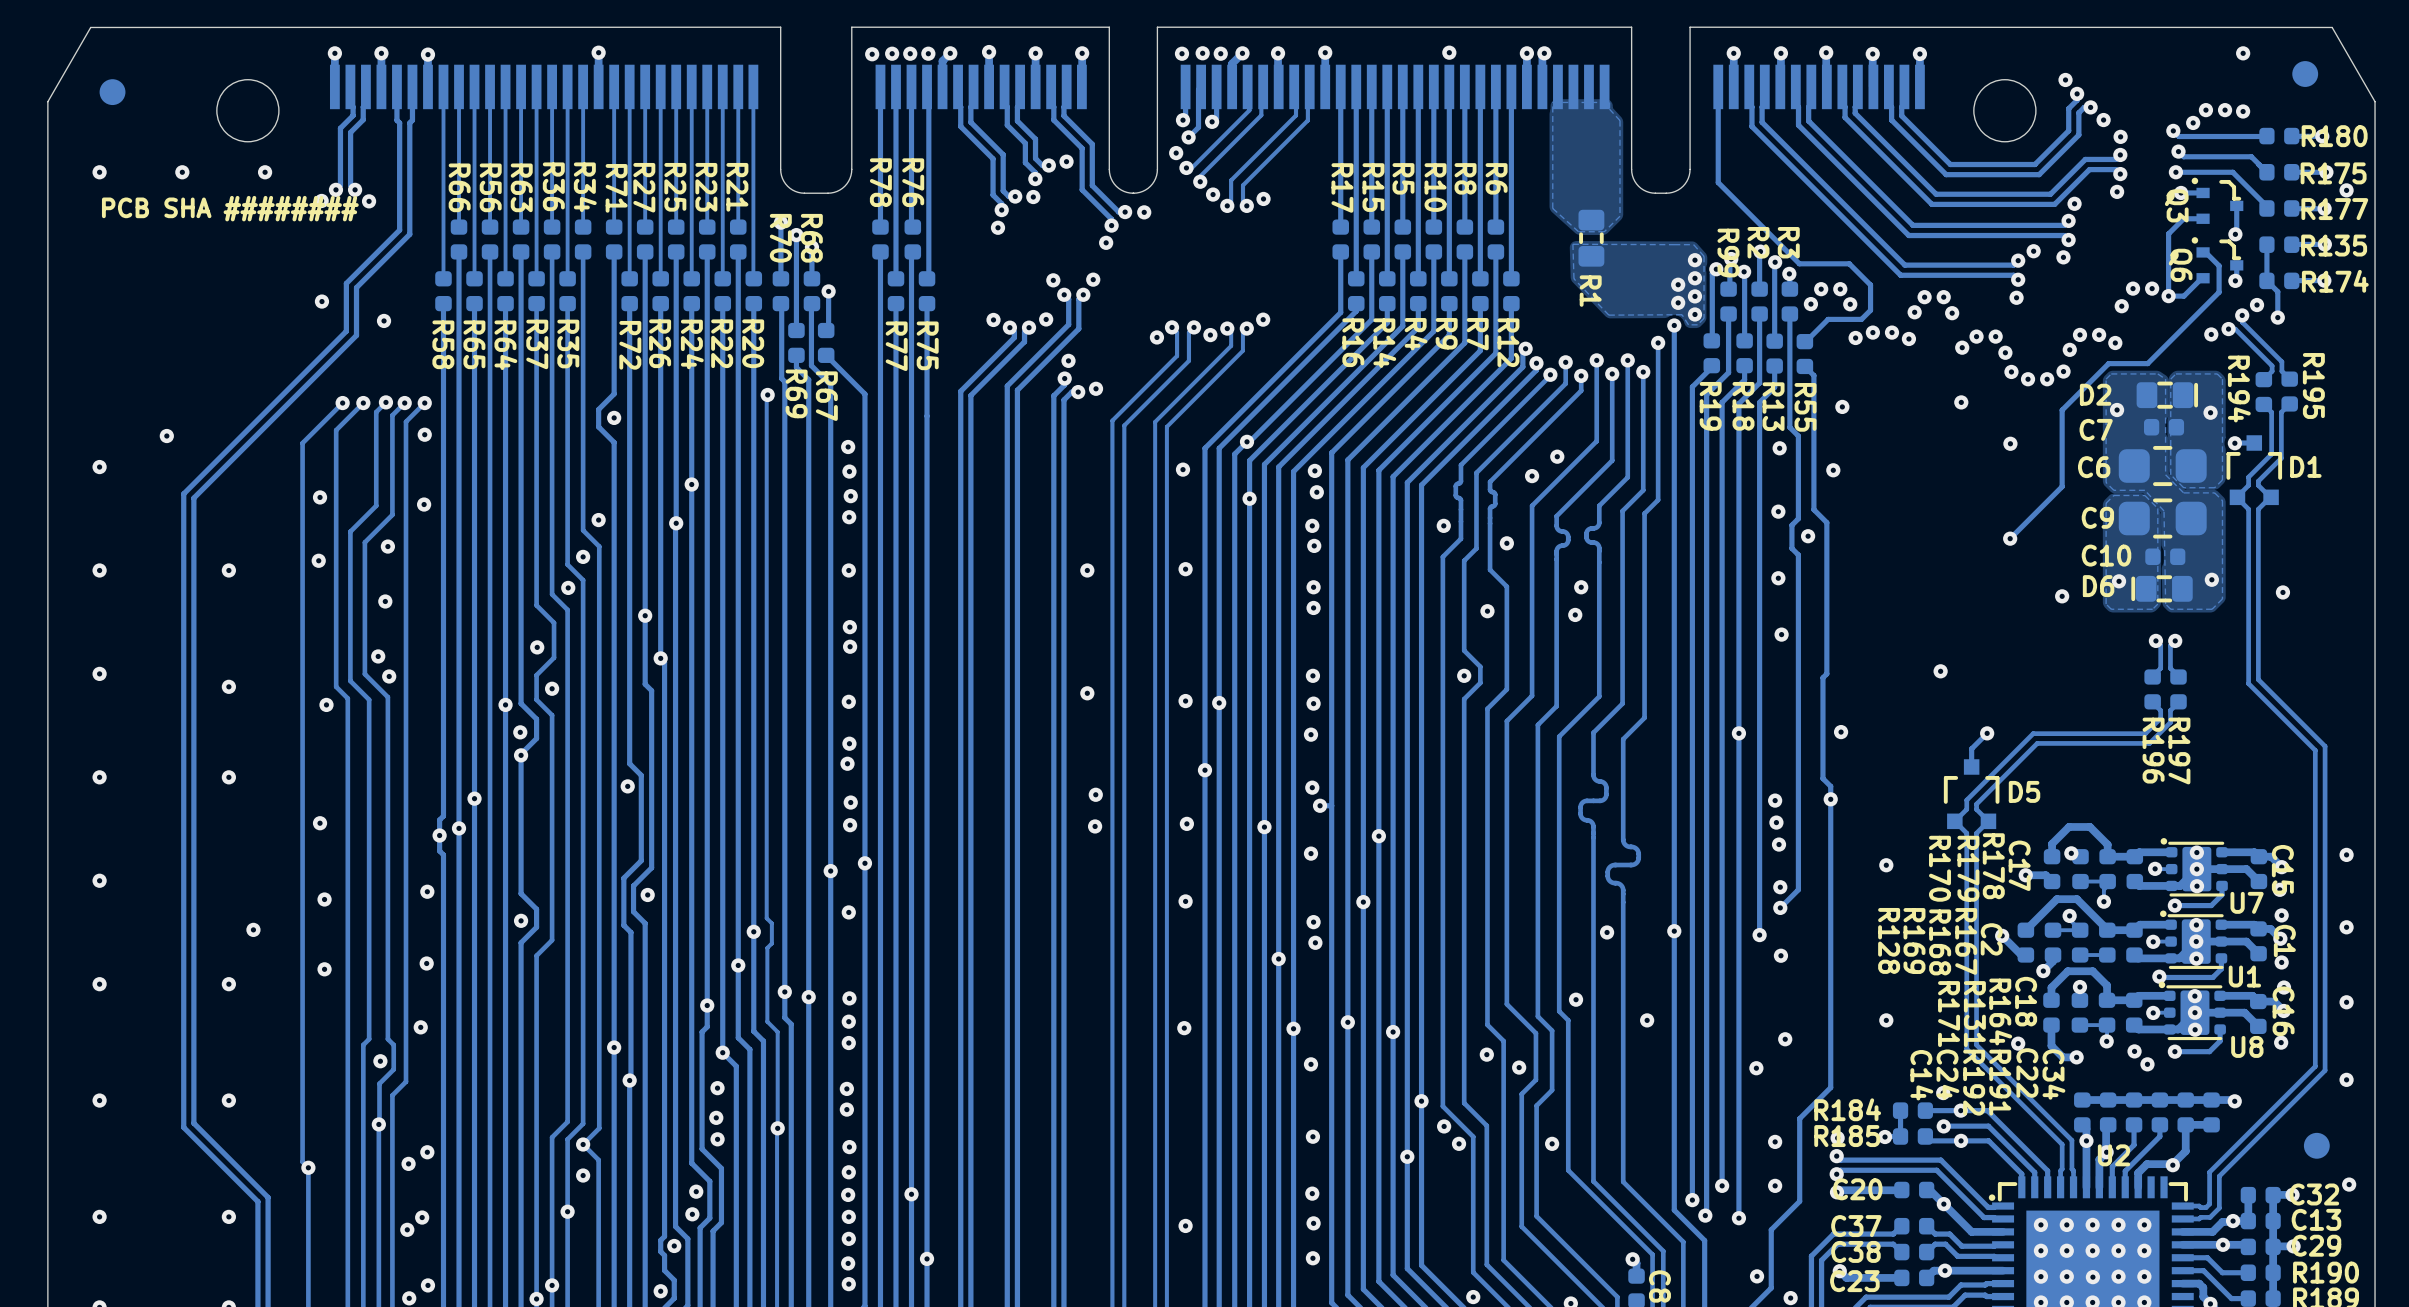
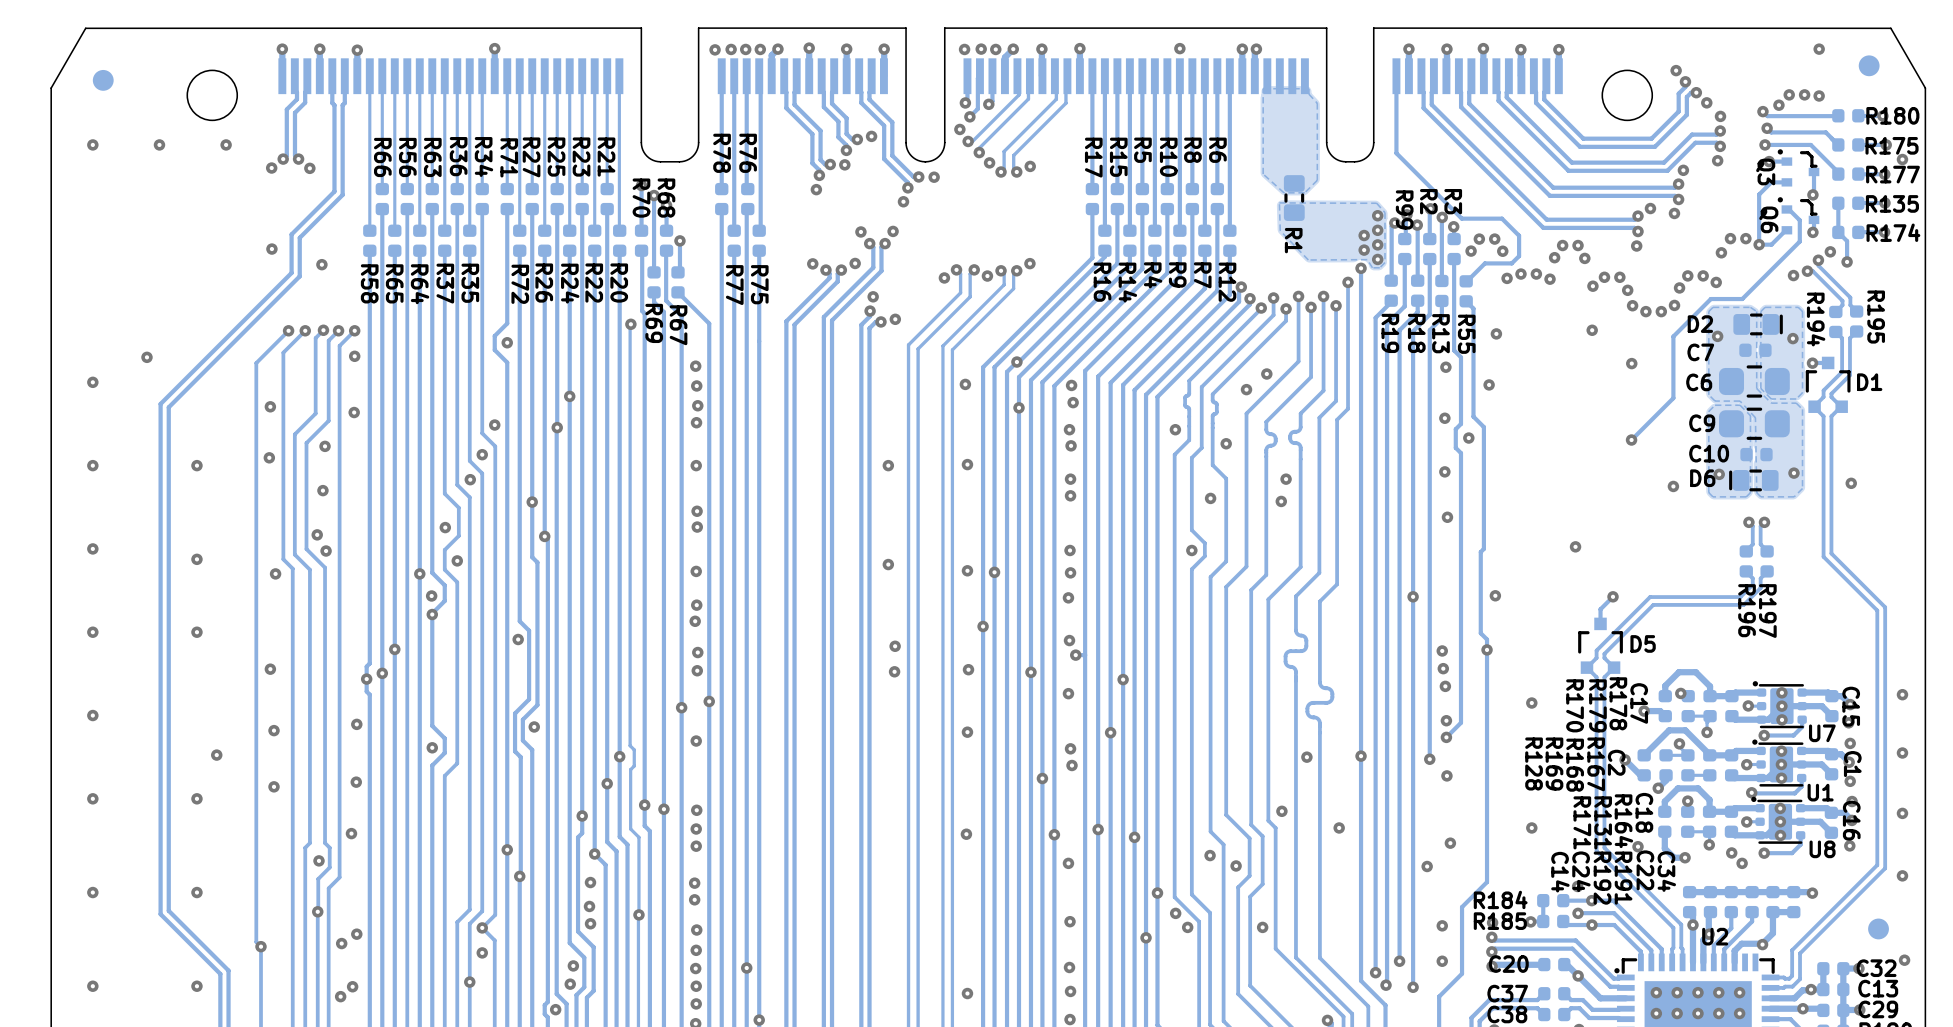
text: PCB SHA ######## (230, 208) -> none

